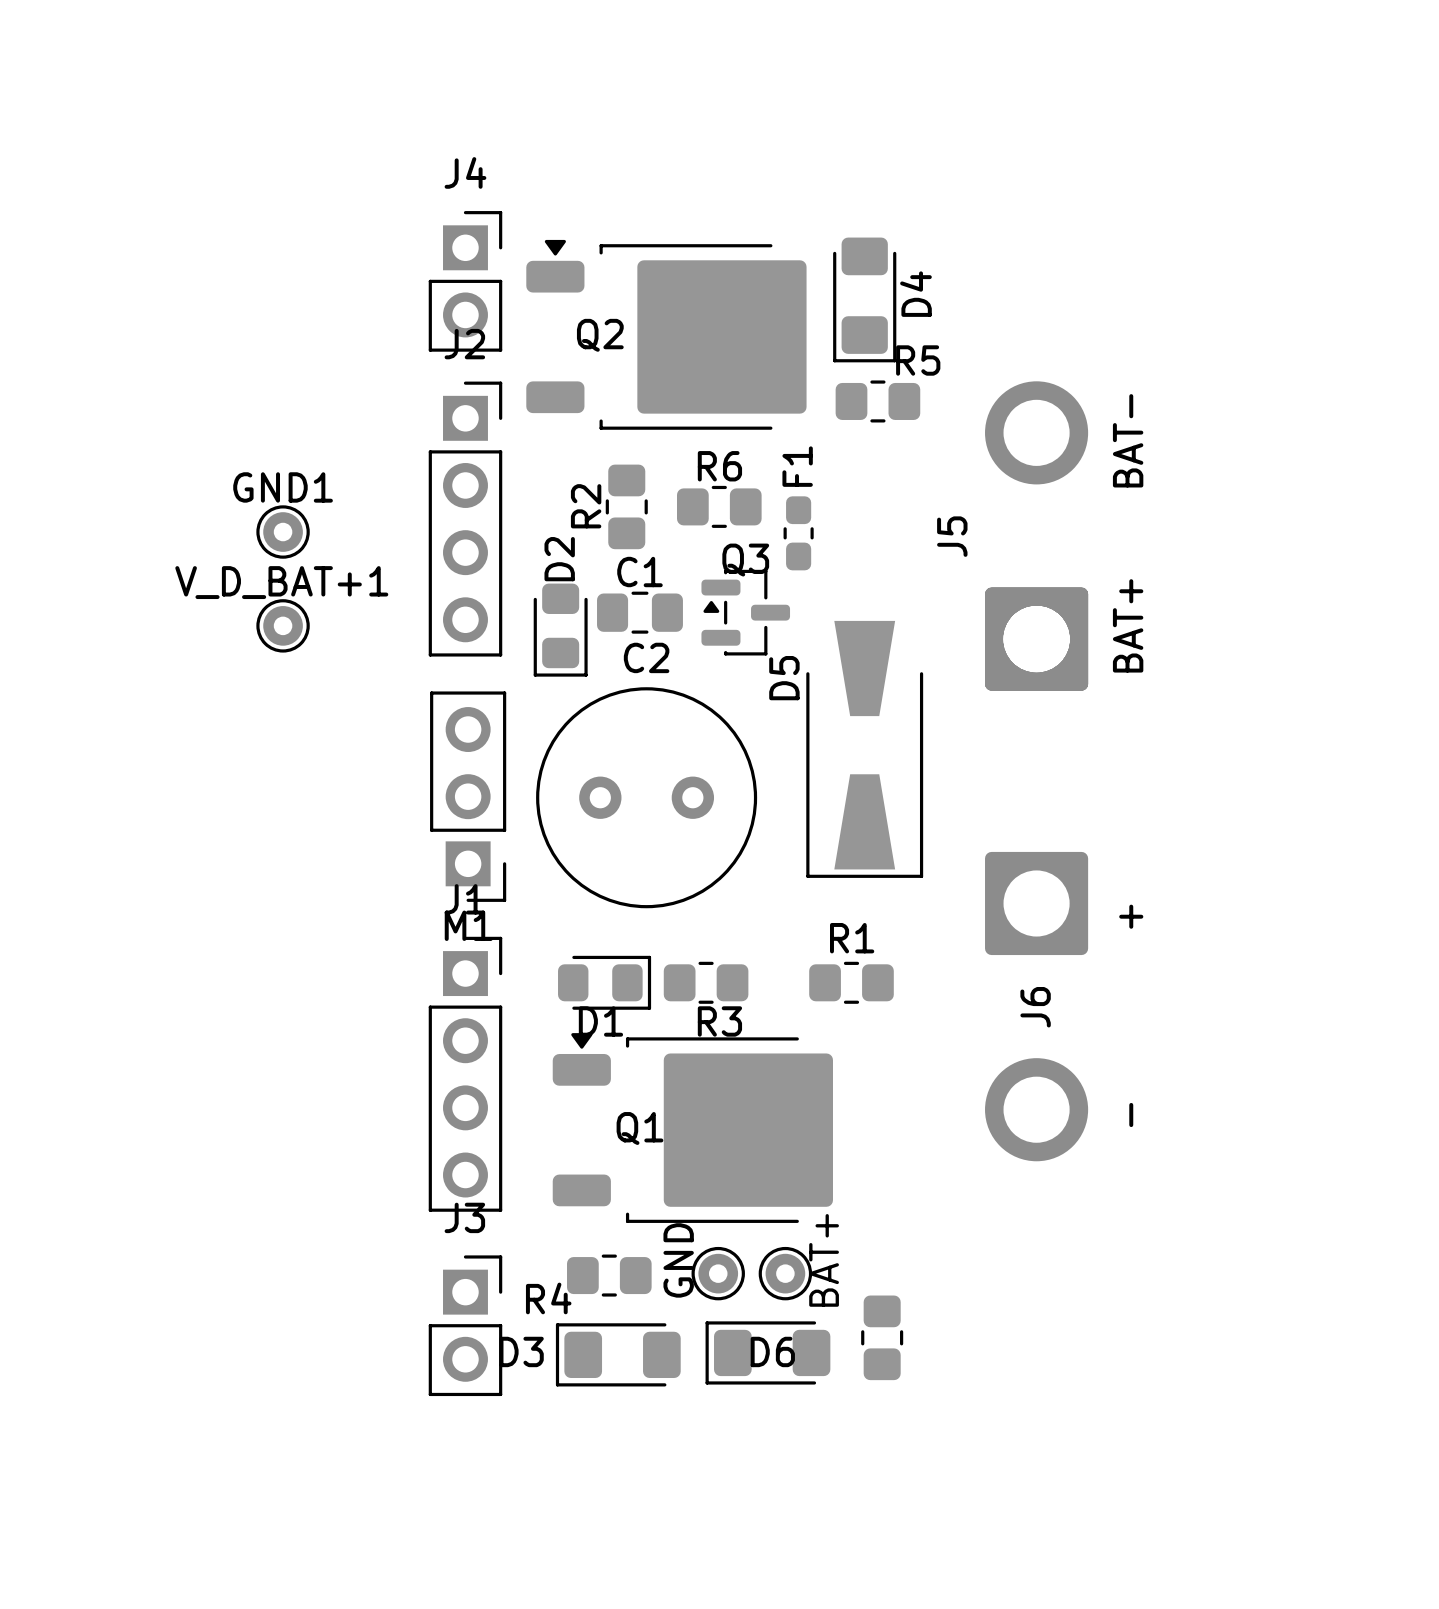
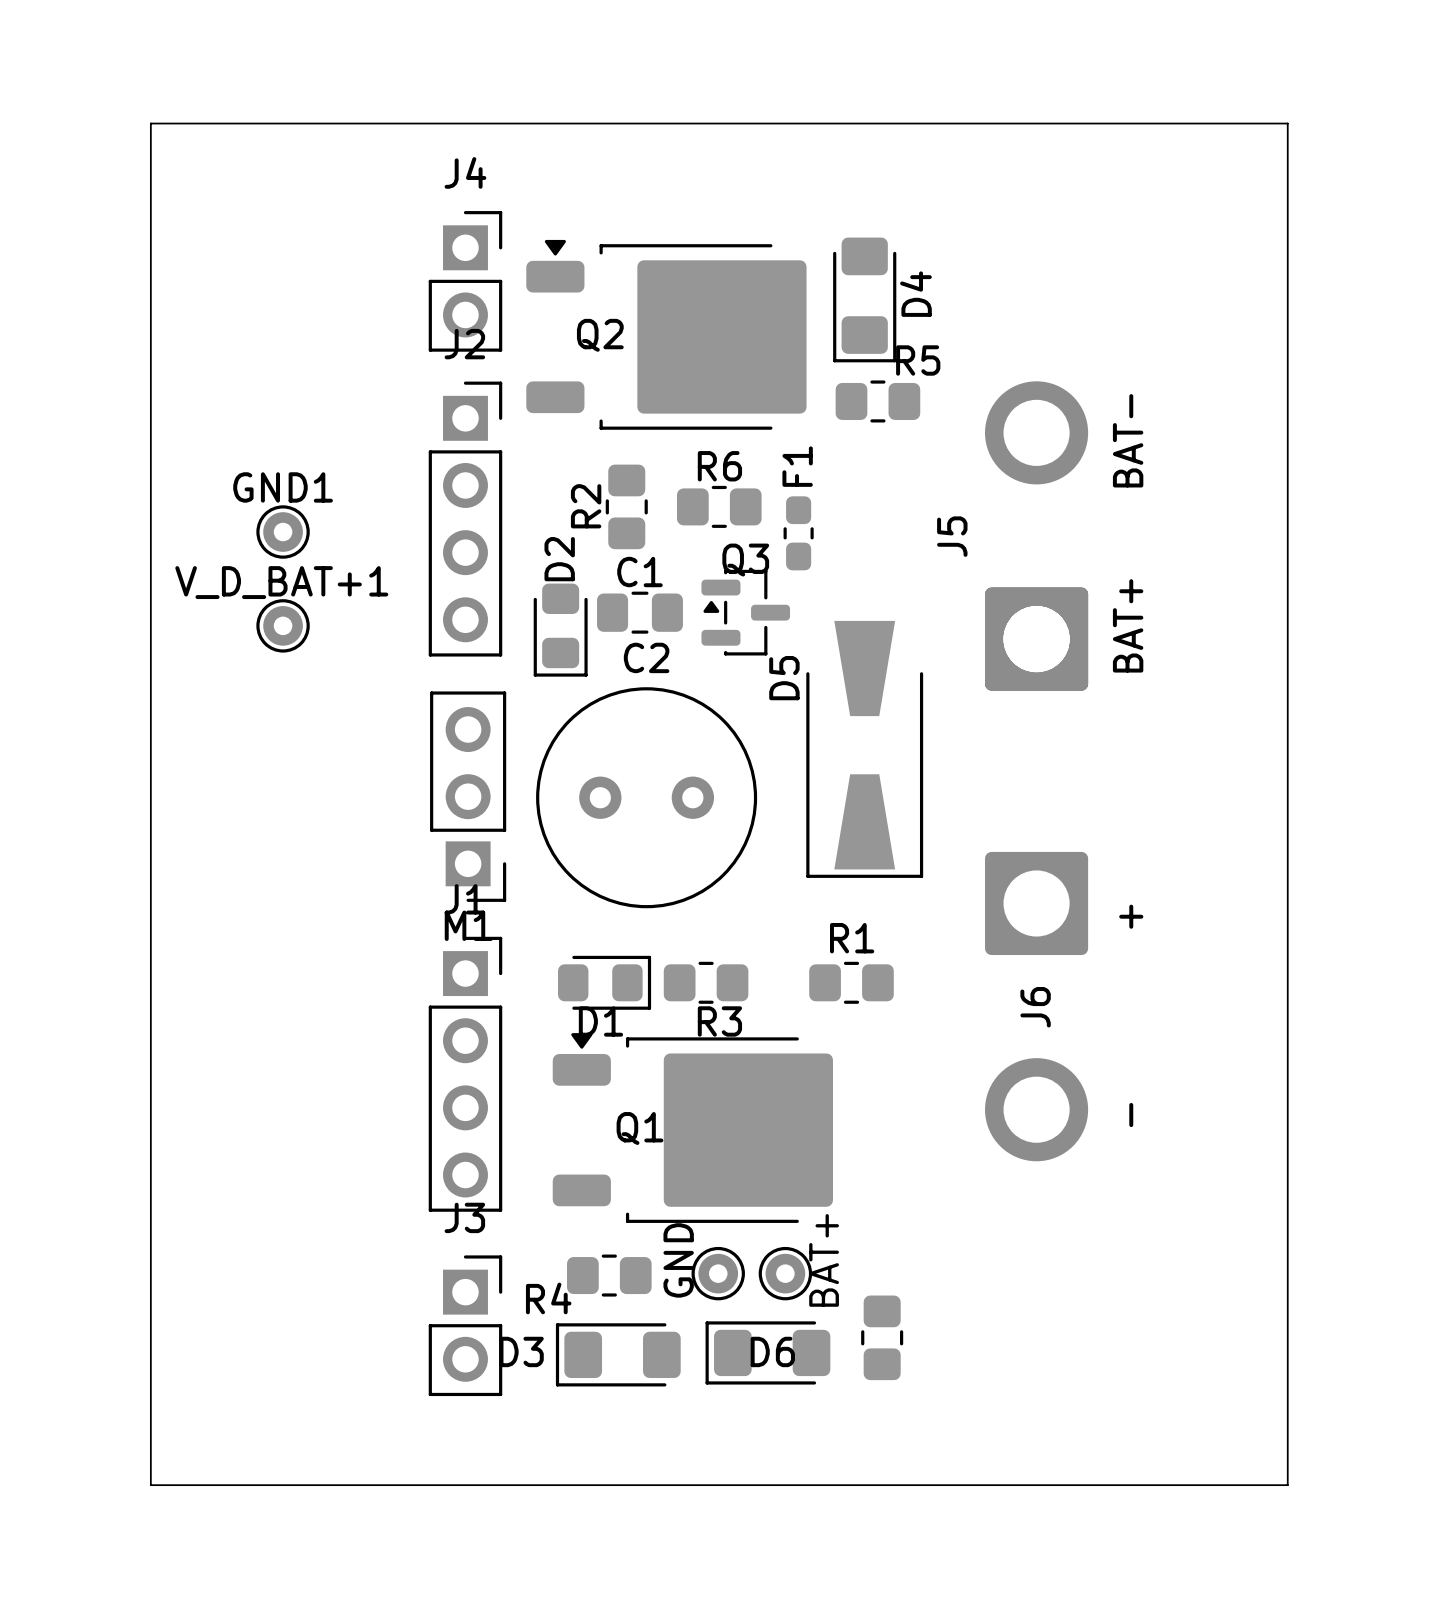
board edge: none -> (150, 123) (1287, 123) (1287, 1485) (150, 1485) (150, 123)

